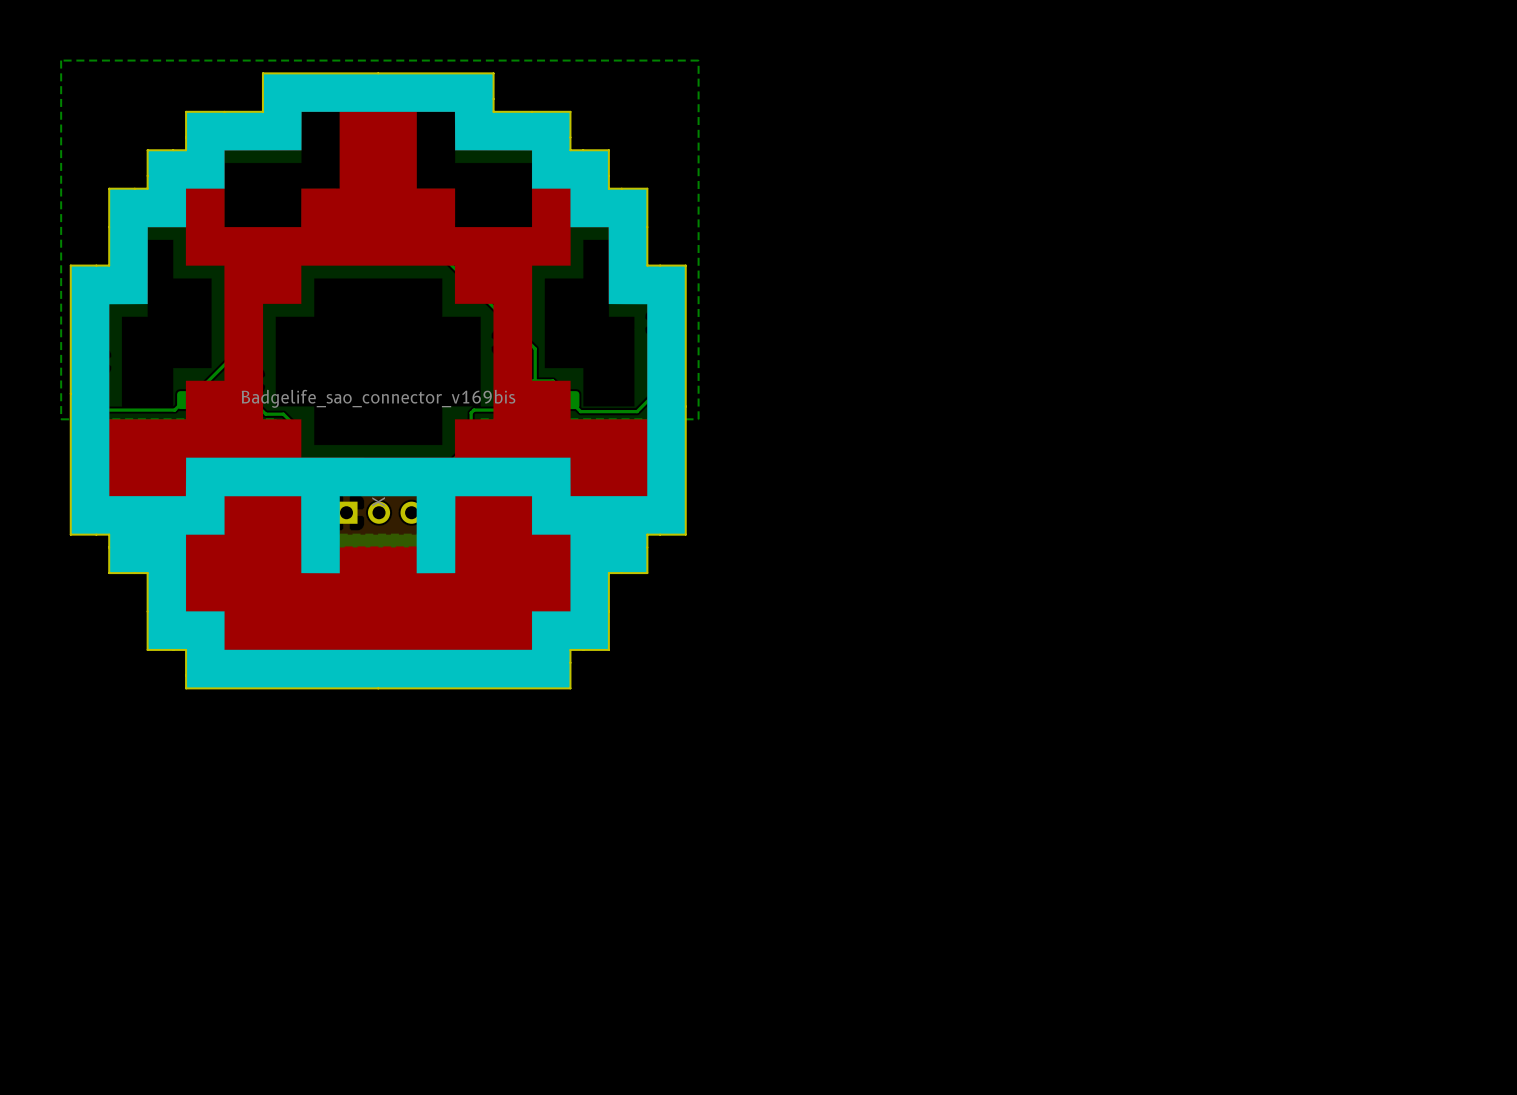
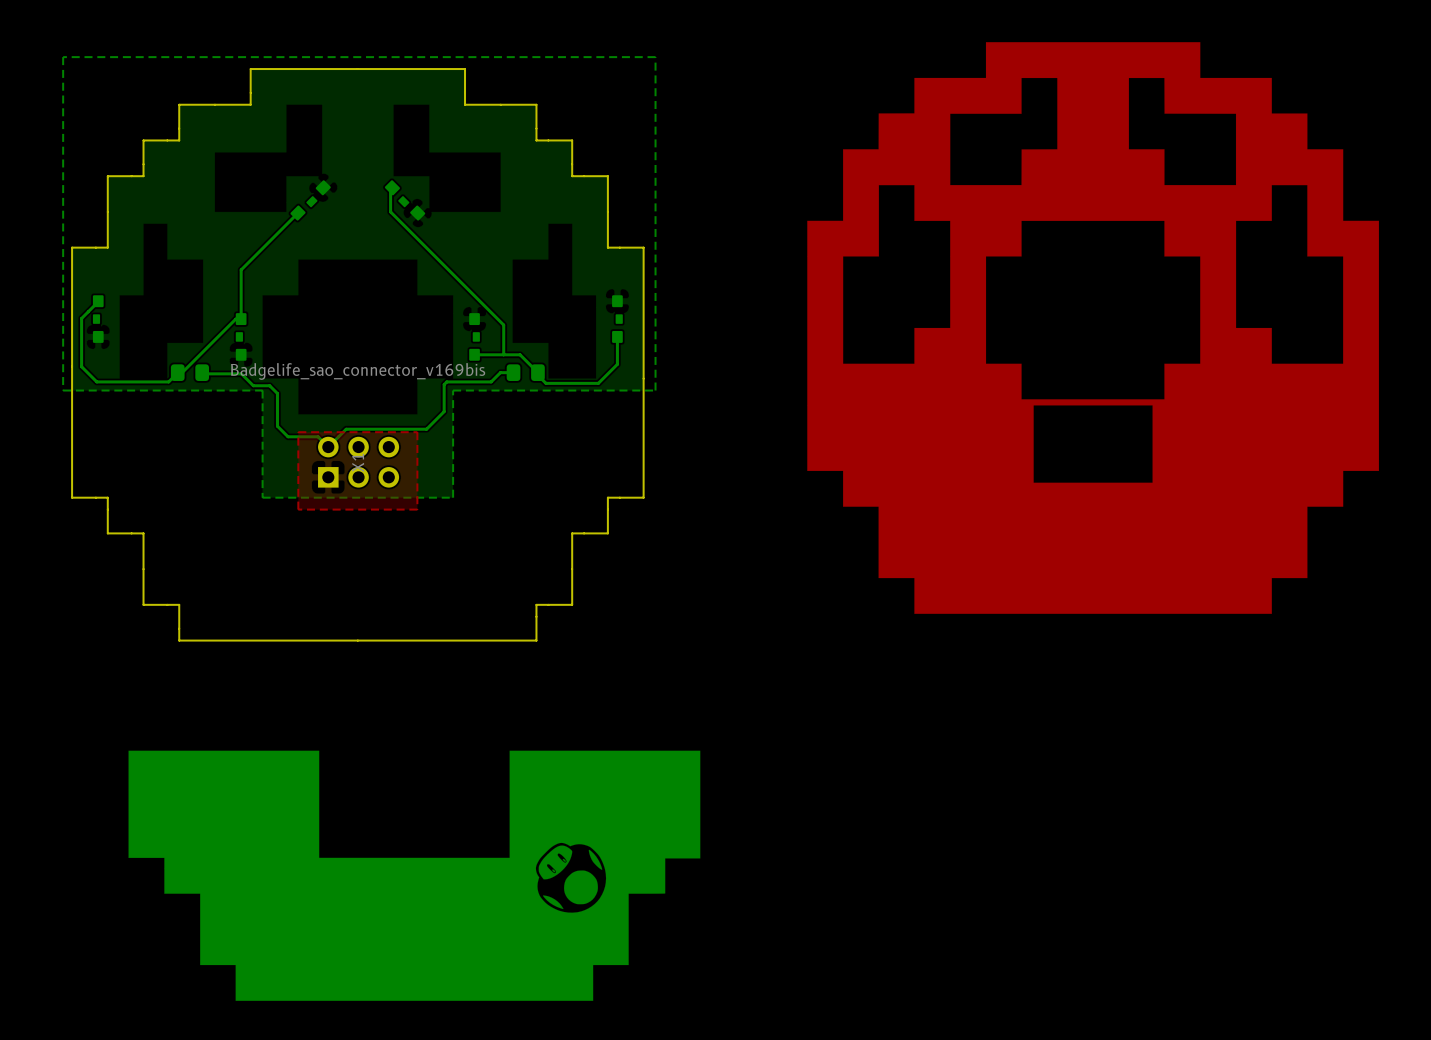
drawing: none -> [807, 42, 1379, 614]
drawing: [70, 73, 686, 689] -> none
drawing: none -> [128, 750, 701, 1001]

